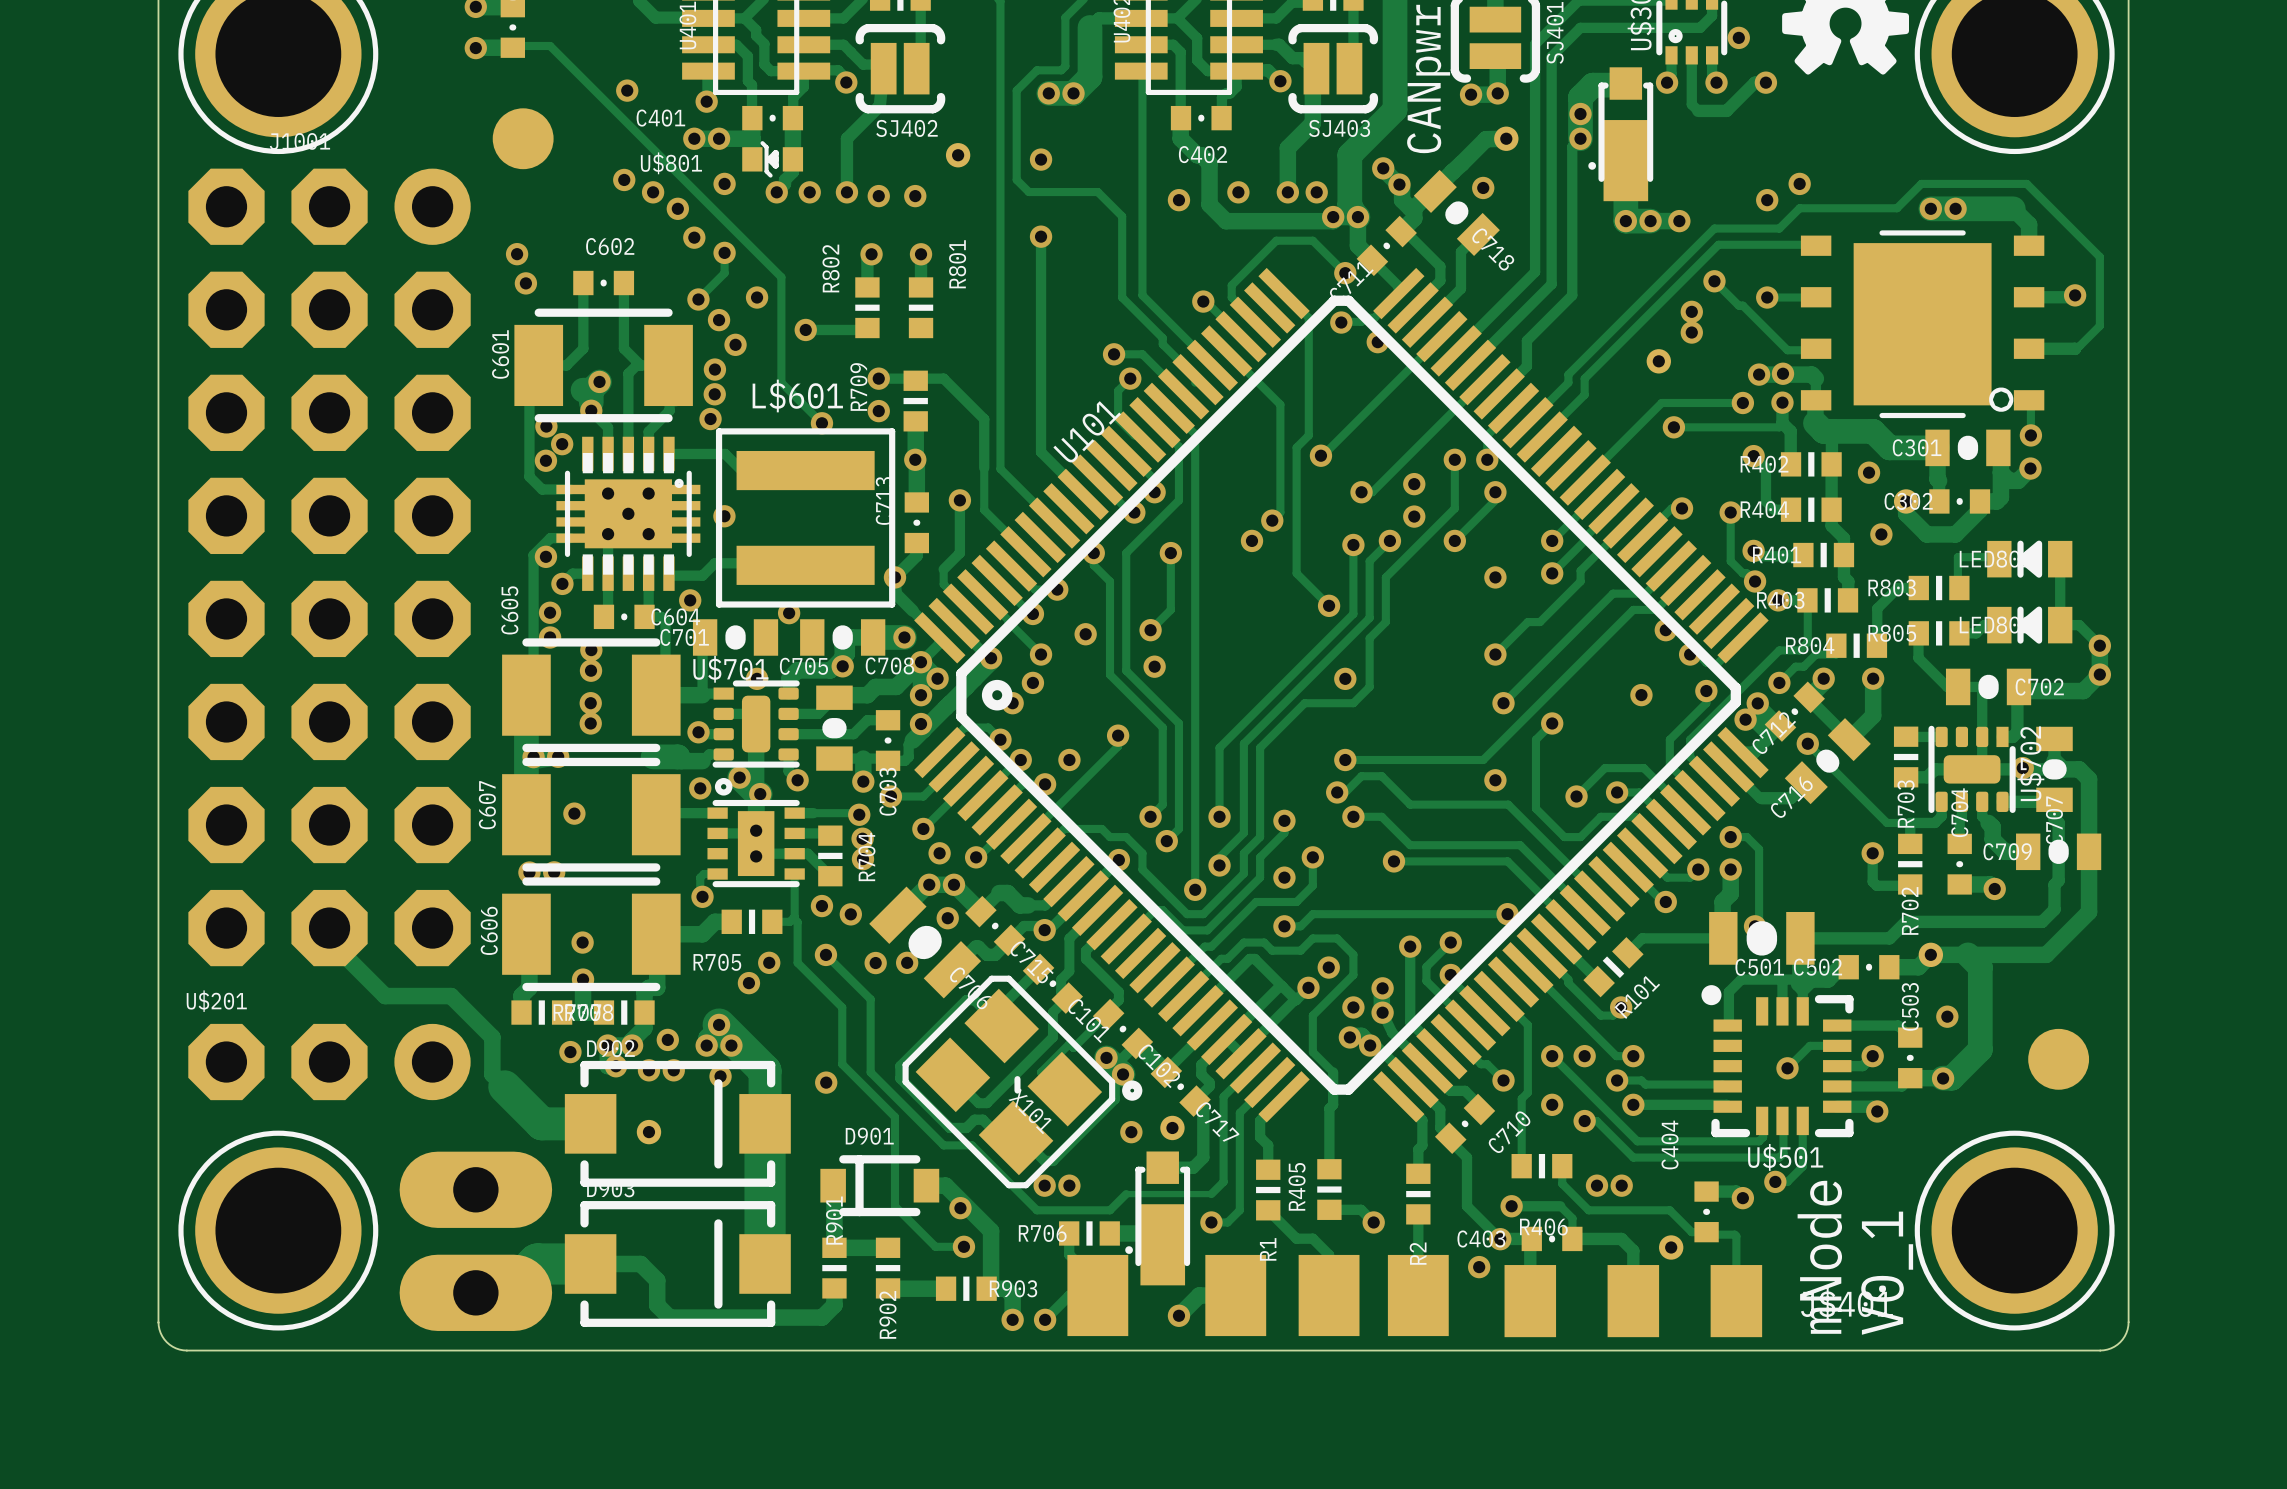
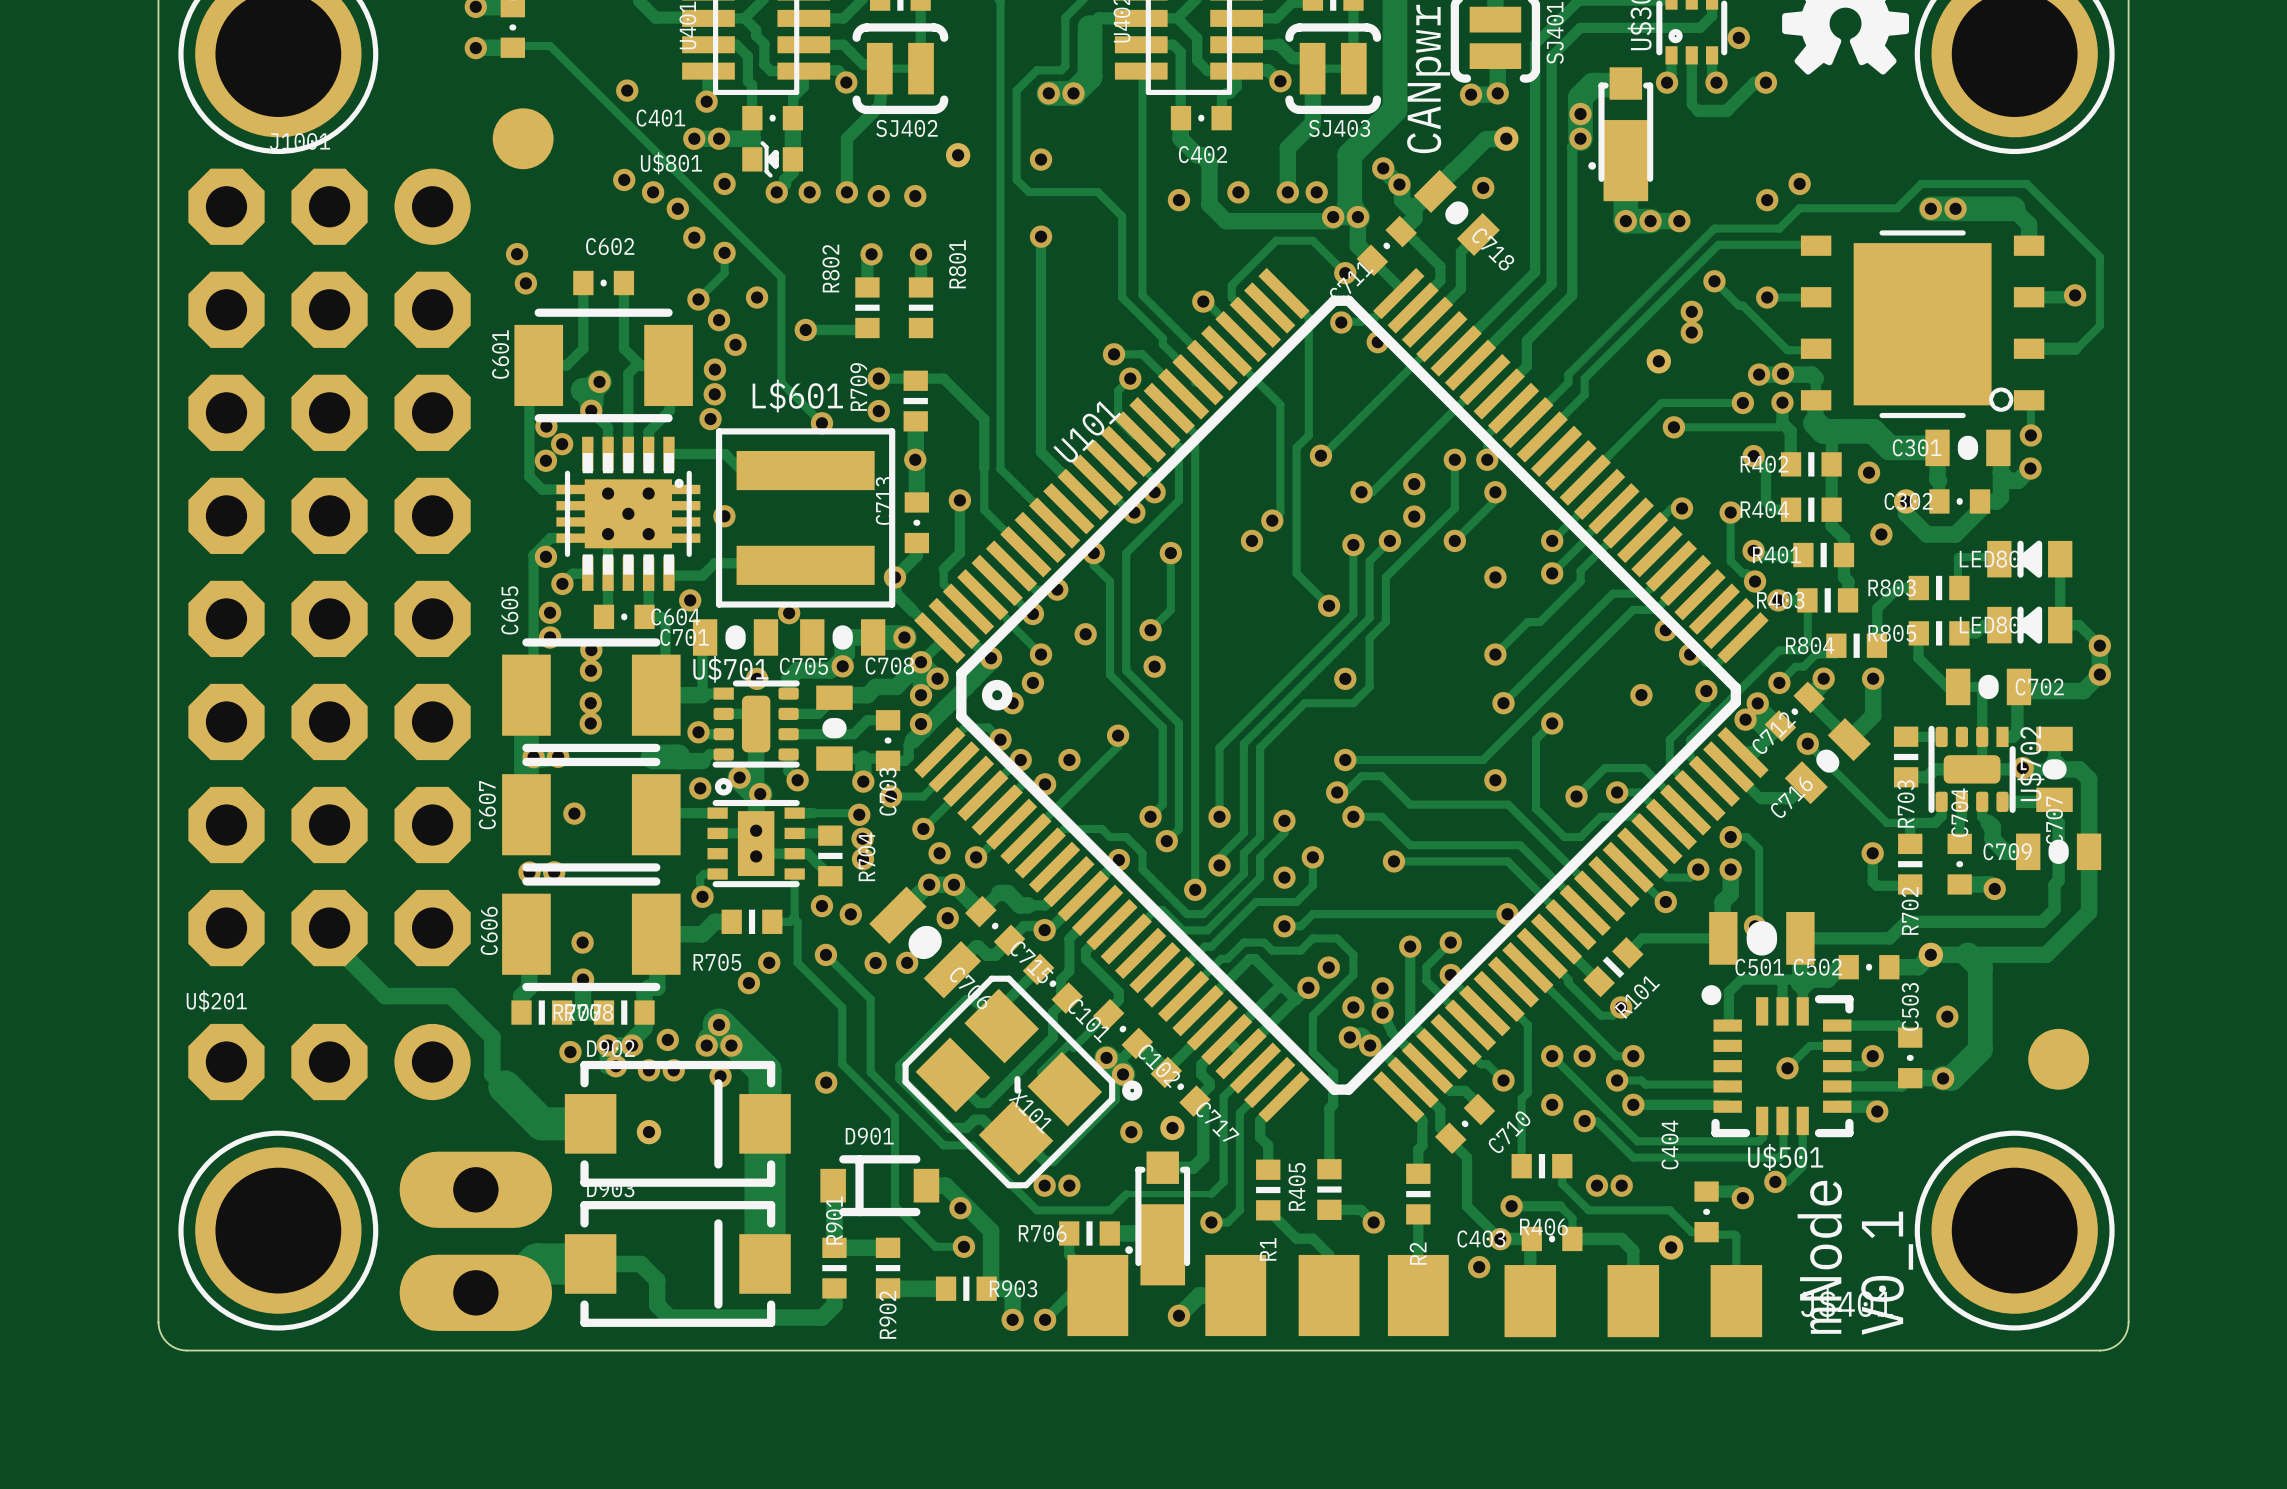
SJ402 footprint: [855, 23, 946, 114] -> [852, 23, 949, 115]
SJ403 footprint: [1288, 23, 1379, 114] -> [1285, 23, 1382, 115]

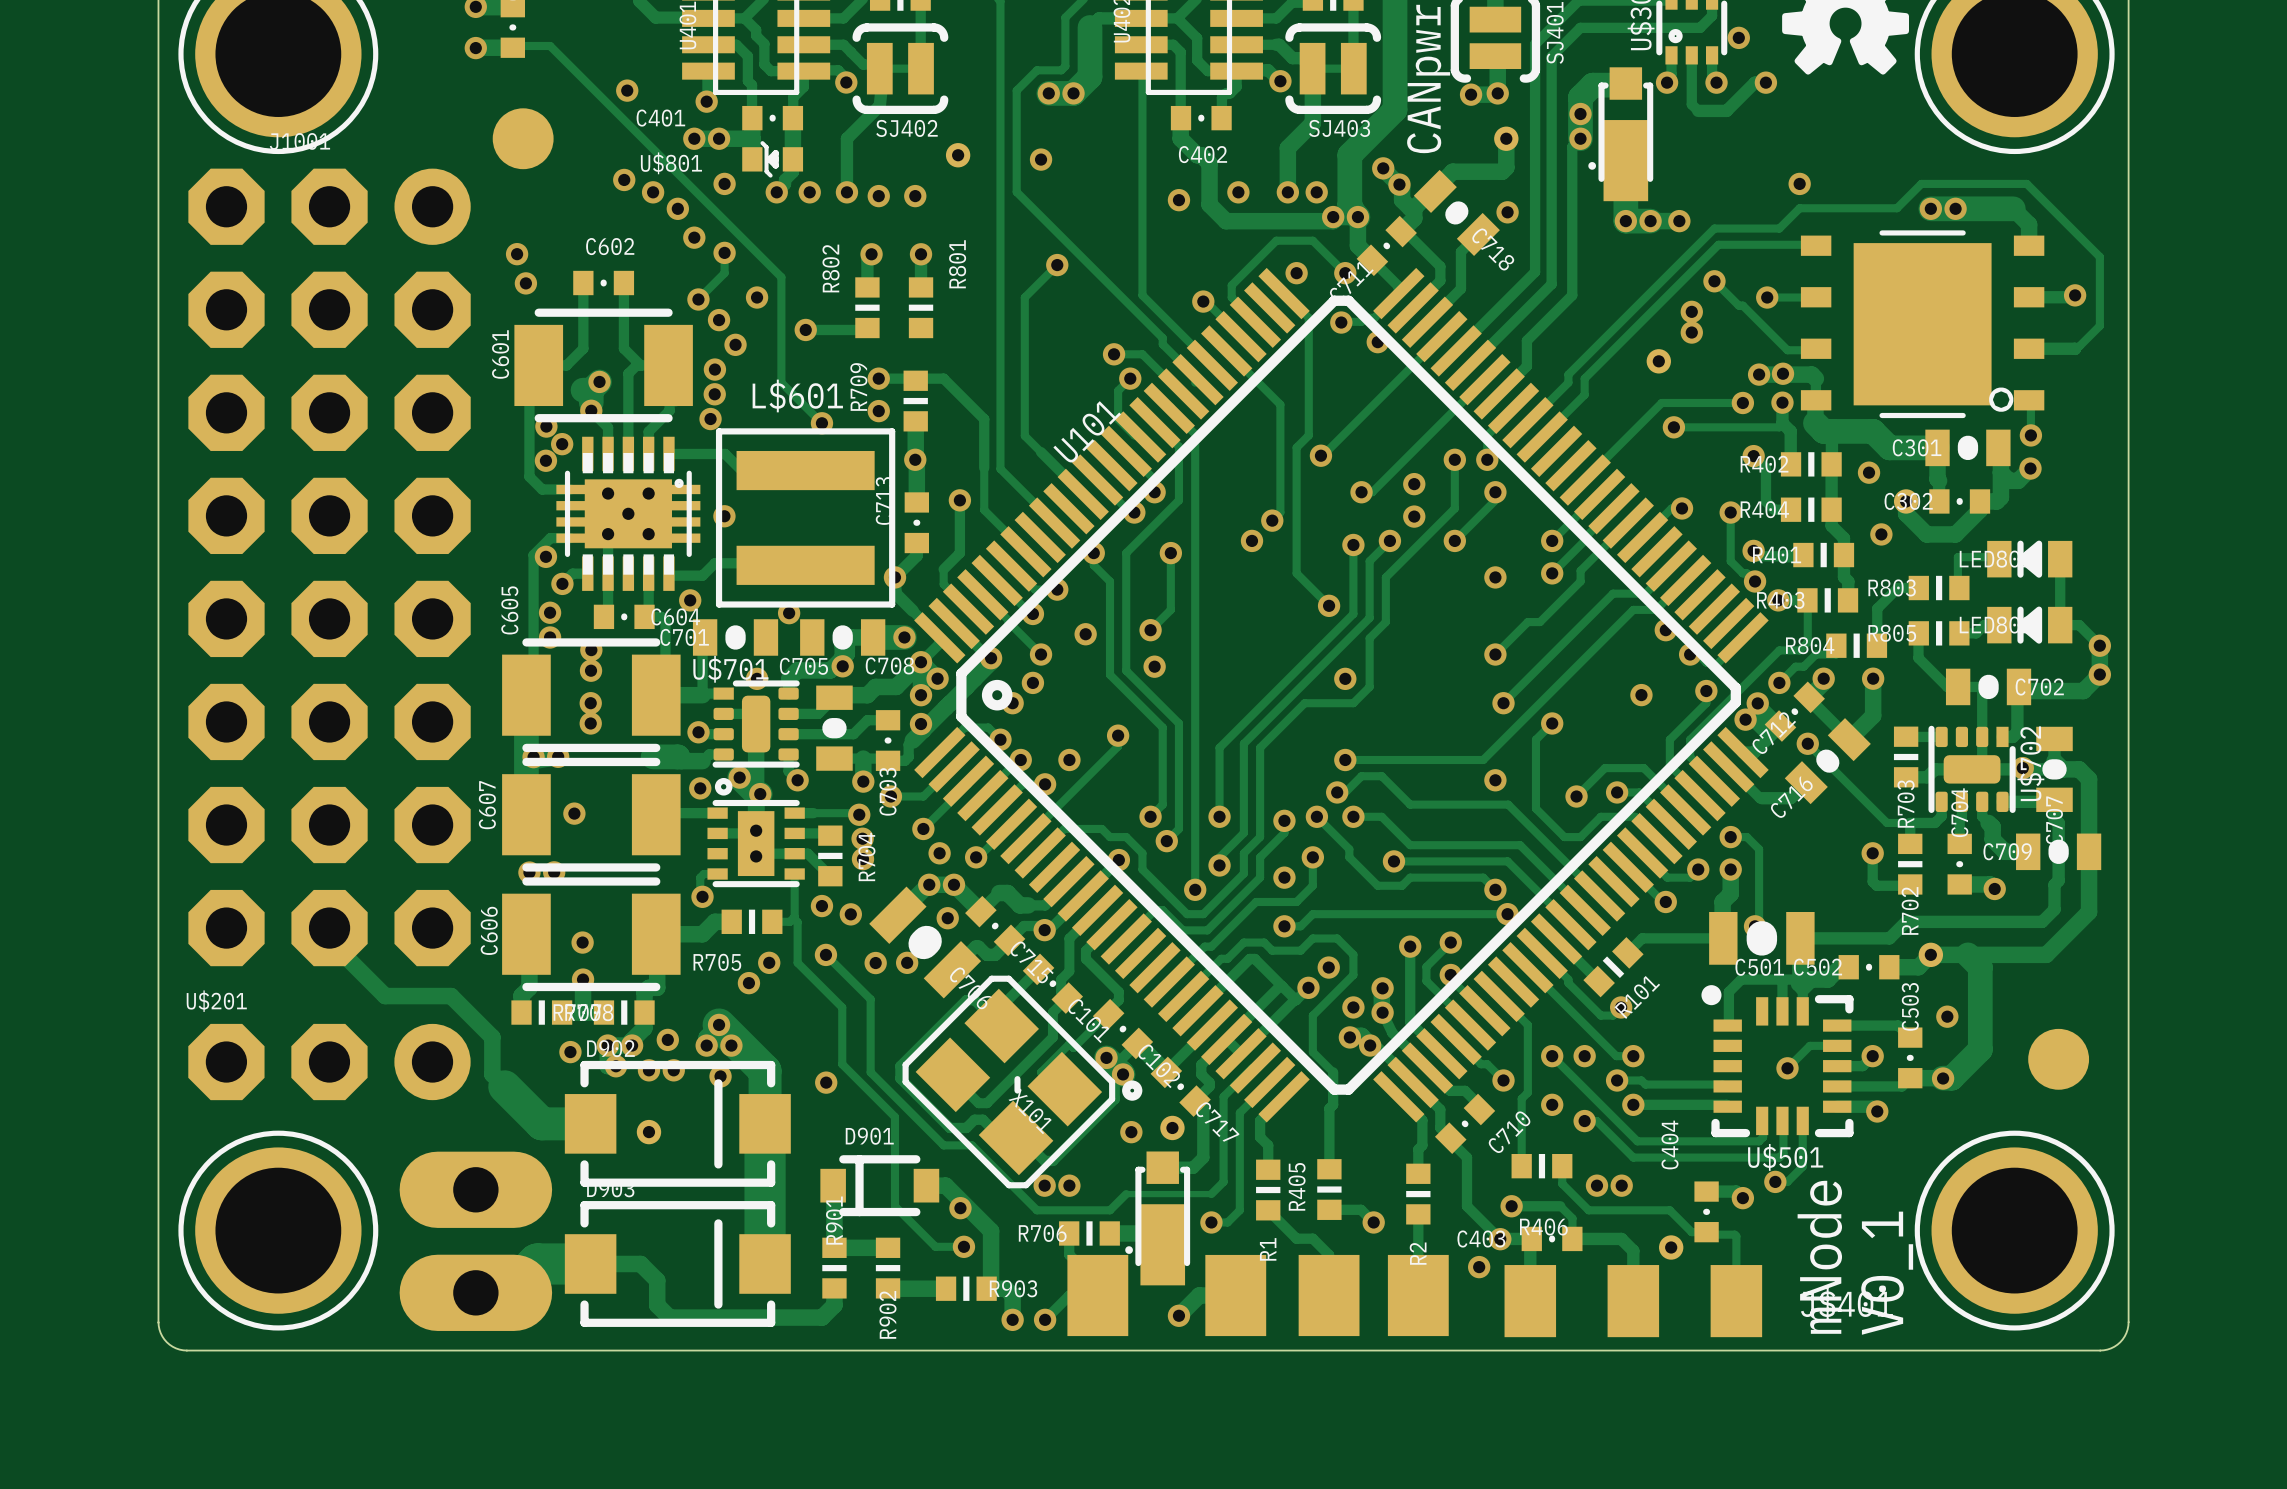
track: (1506, 138) (1486, 139) (1452, 171) -> (1506, 138) (1506, 167) (1502, 171) (1452, 171)
track: (1016, 179) (1028, 192) (1097, 192) (1122, 216) (1122, 297) -> (1016, 179) (1016, 192) (1122, 297)
via position: (1483, 187) -> (1507, 212)
via: (1767, 200) -> none
track: (1041, 236) (1041, 452) -> (1057, 265) (1024, 297) (1024, 435) (1041, 452)
via position: (1041, 236) -> (1057, 265)
via: none -> (1296, 273)
track: none -> (1316, 816) (1349, 849) (1349, 857) (1377, 885) (1402, 885) (1410, 877) (1483, 877) (1495, 889)
via: none -> (1316, 816)
via: none -> (1495, 889)

